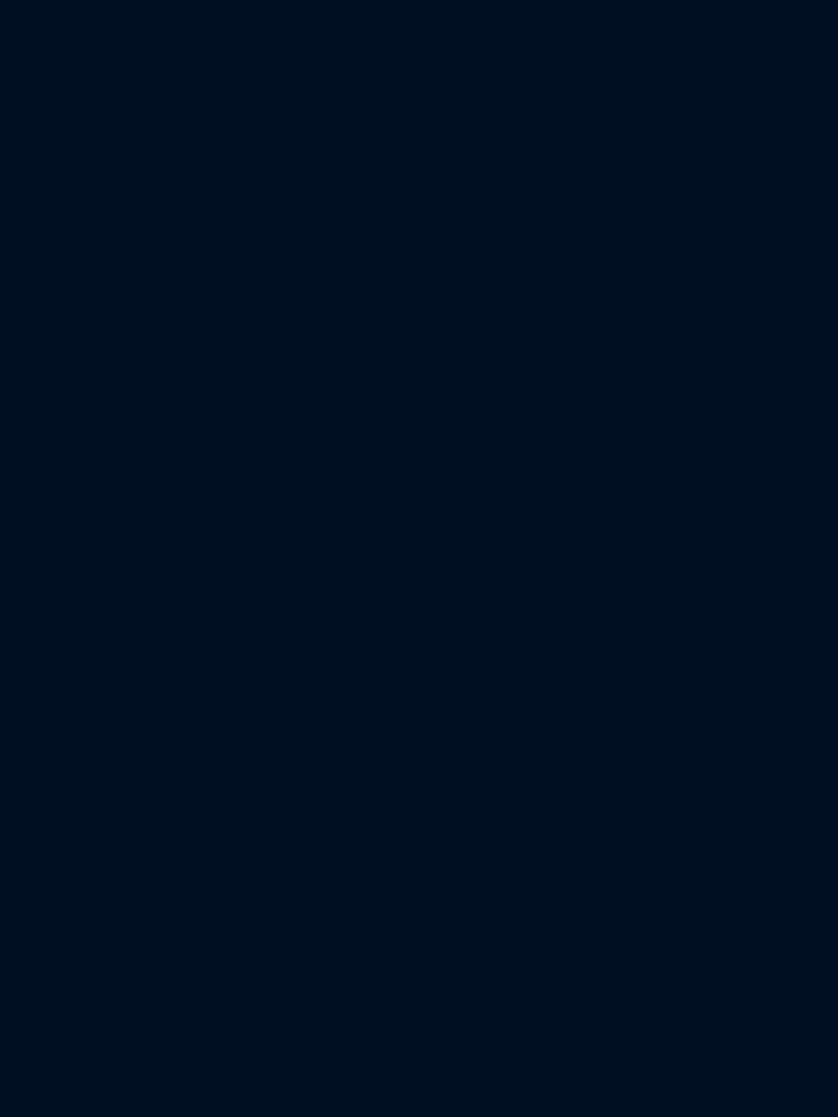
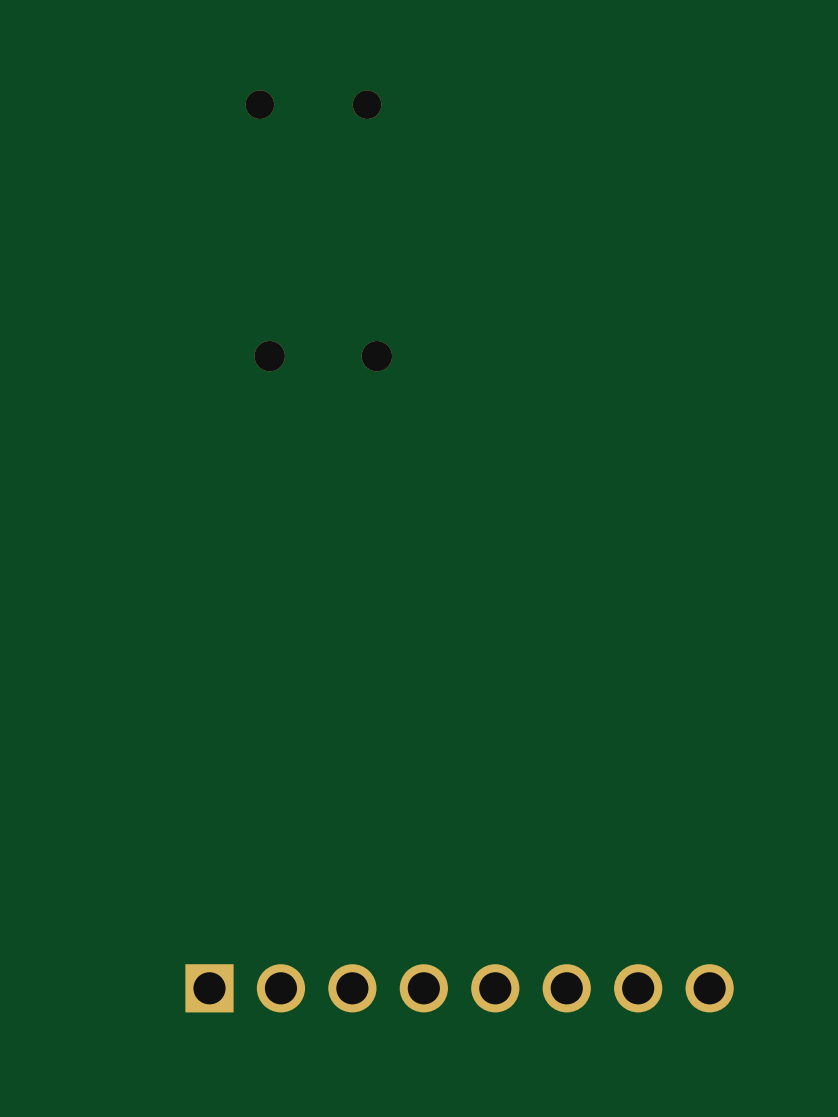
part: none -> (313, 104)
part: none -> (323, 356)
part: none -> (459, 988)

